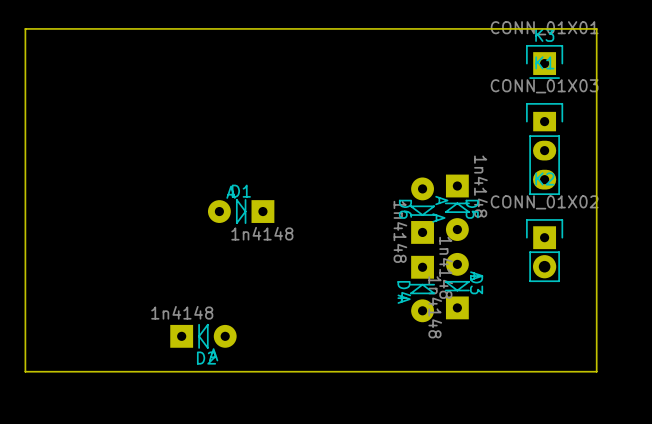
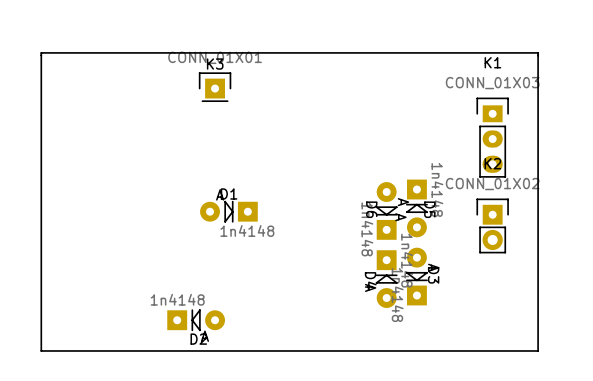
K3 position: (544, 61) -> (215, 87)
K1 position: (544, 149) -> (492, 137)
K2 position: (544, 250) -> (492, 225)

